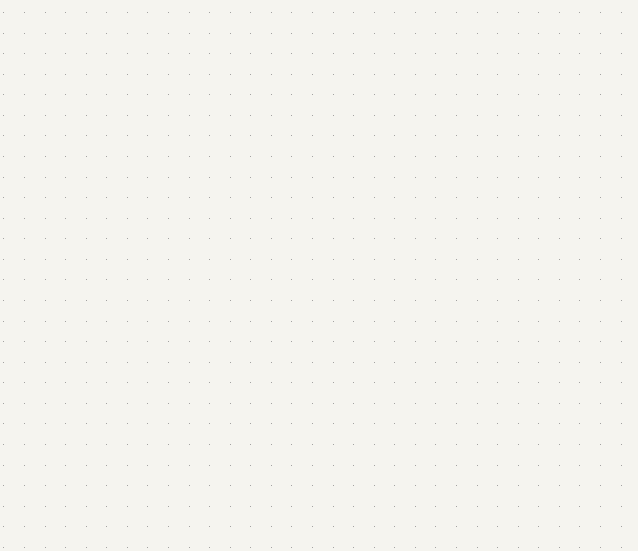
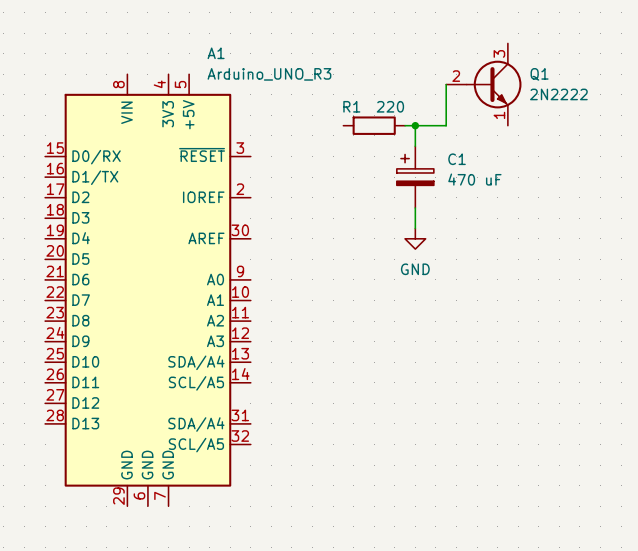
wire: none -> (446, 84) (446, 125) (405, 125)
Q1: none -> 2N2222 (483, 84)
R1: none -> 220 (374, 125)
wire: none -> (415, 125) (415, 146)
junction: none -> (415, 125)
C1: none -> 470 uF (415, 177)
wire: none -> (415, 207) (415, 228)
power symbol: none -> GND (415, 238)
A1: none -> Arduino_UNO_R3 (147, 290)

